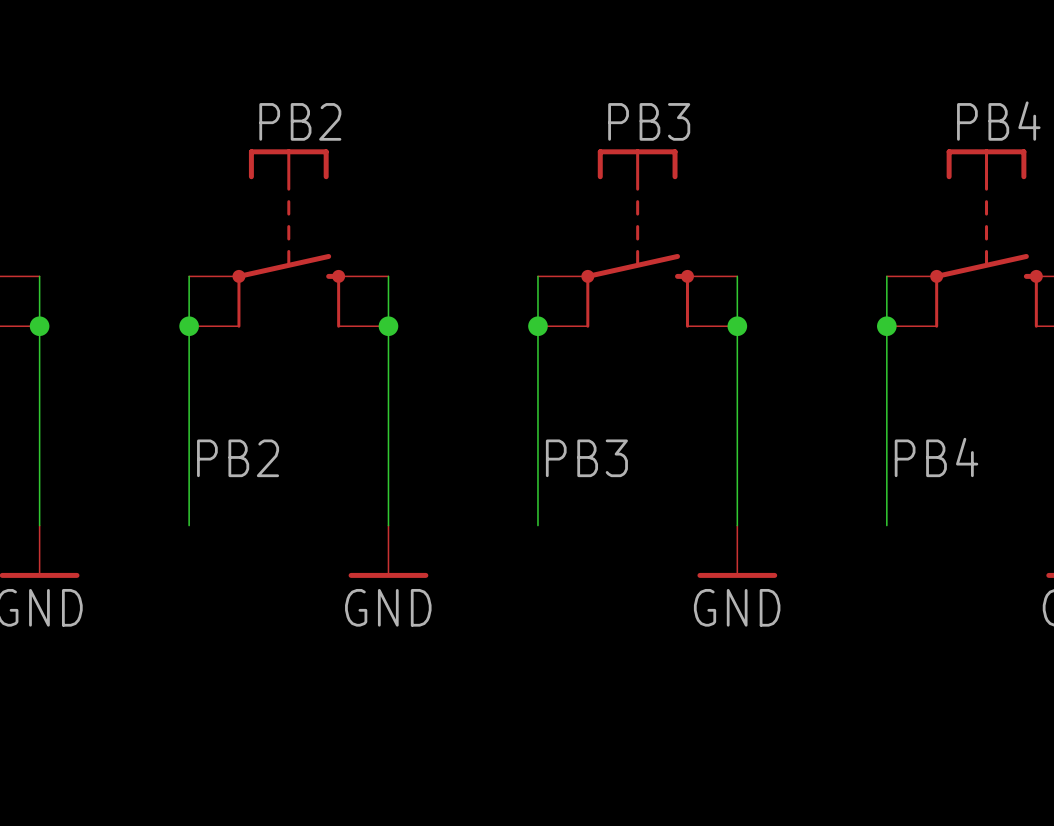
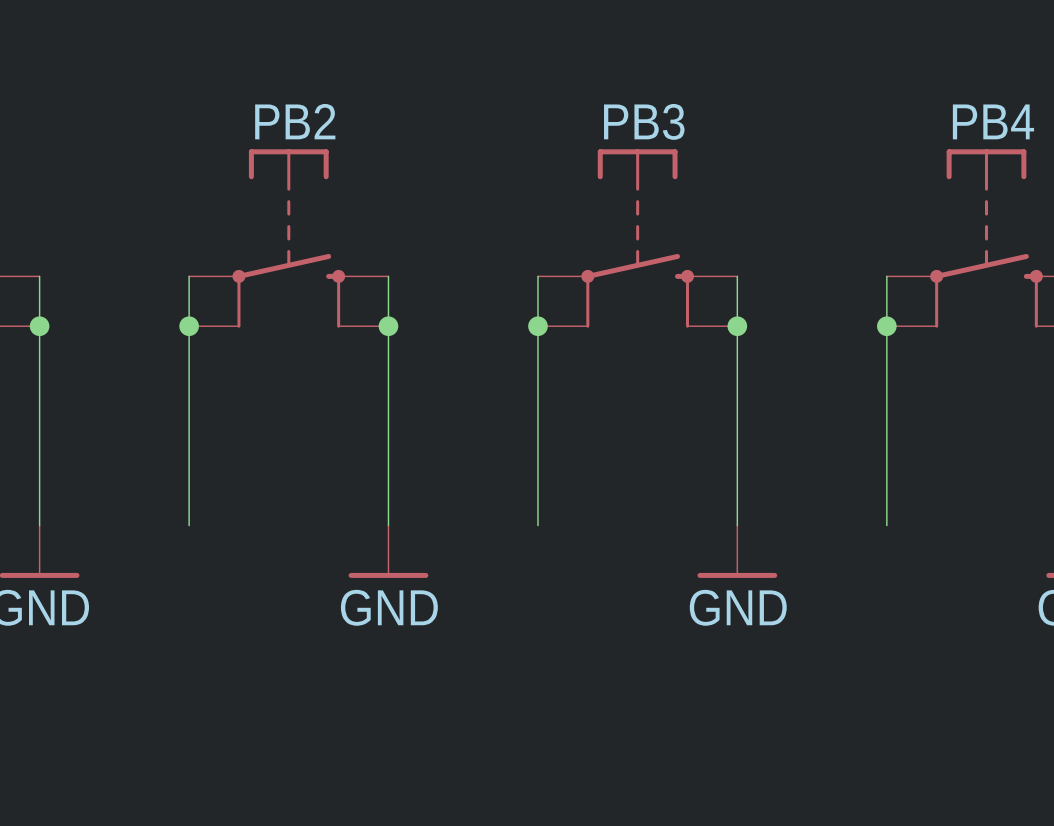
label: PB4 (936, 457) -> none
label: PB2 (238, 458) -> none
label: PB3 (586, 458) -> none

